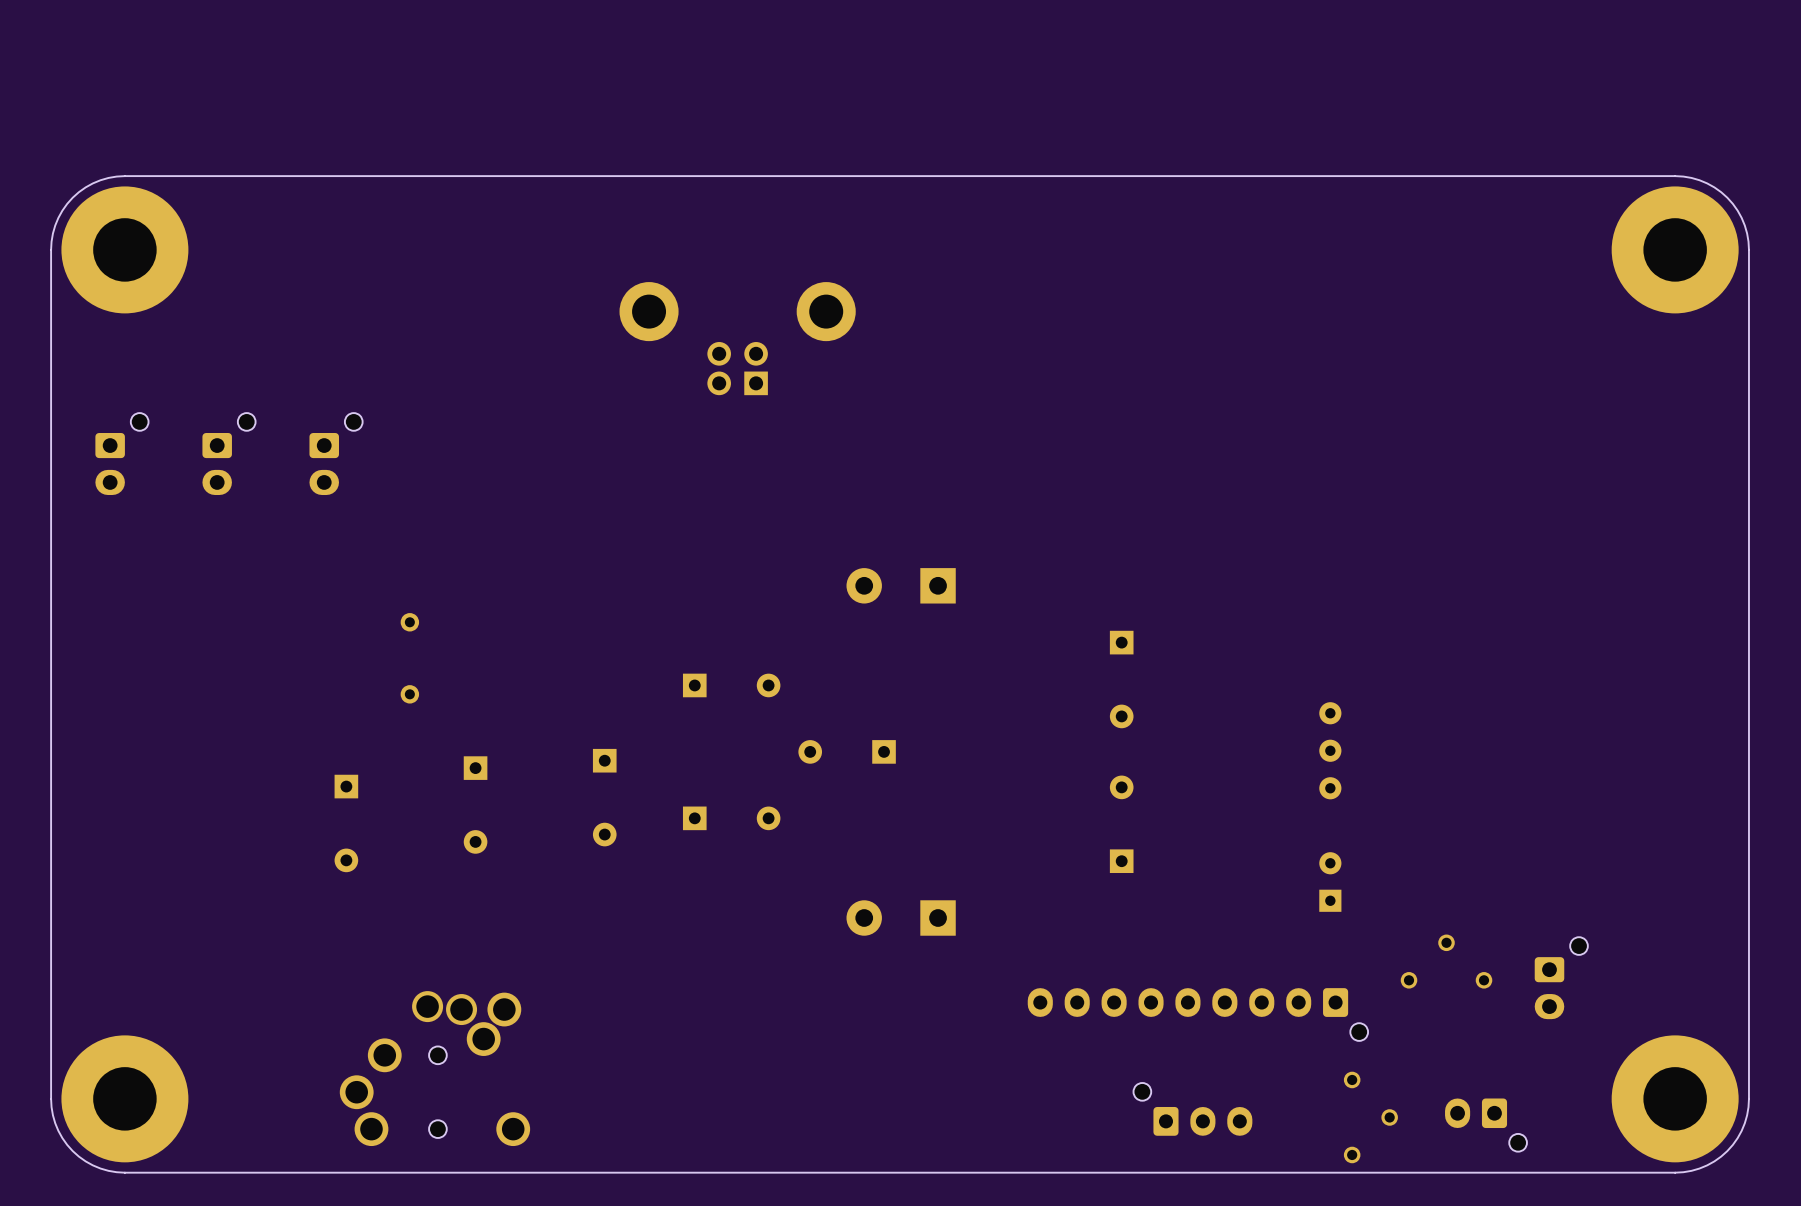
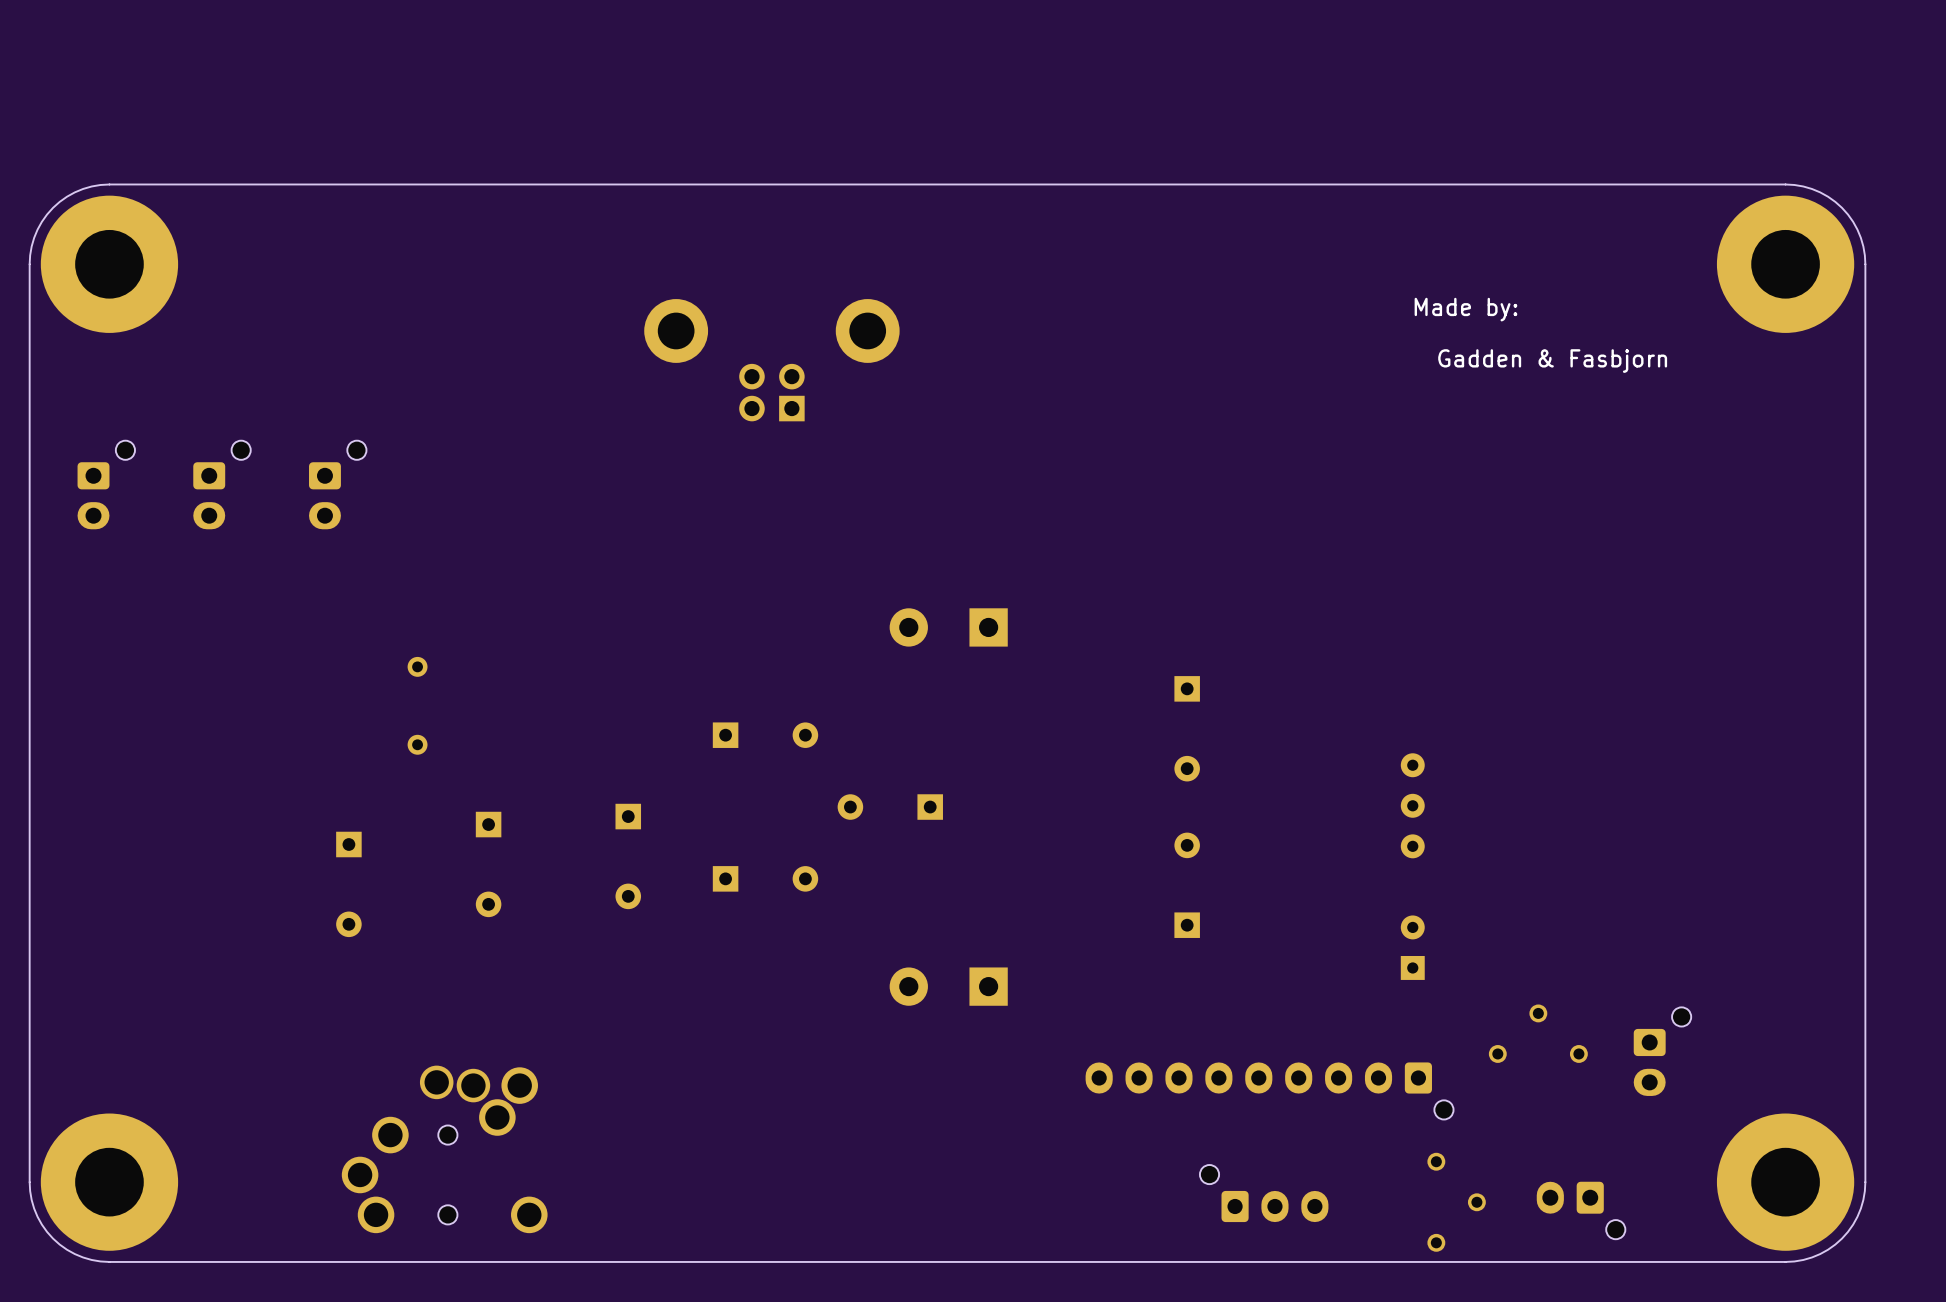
text: none -> Made by: (1465, 309)
text: none -> Gadden & Fasbjorn (1552, 361)

